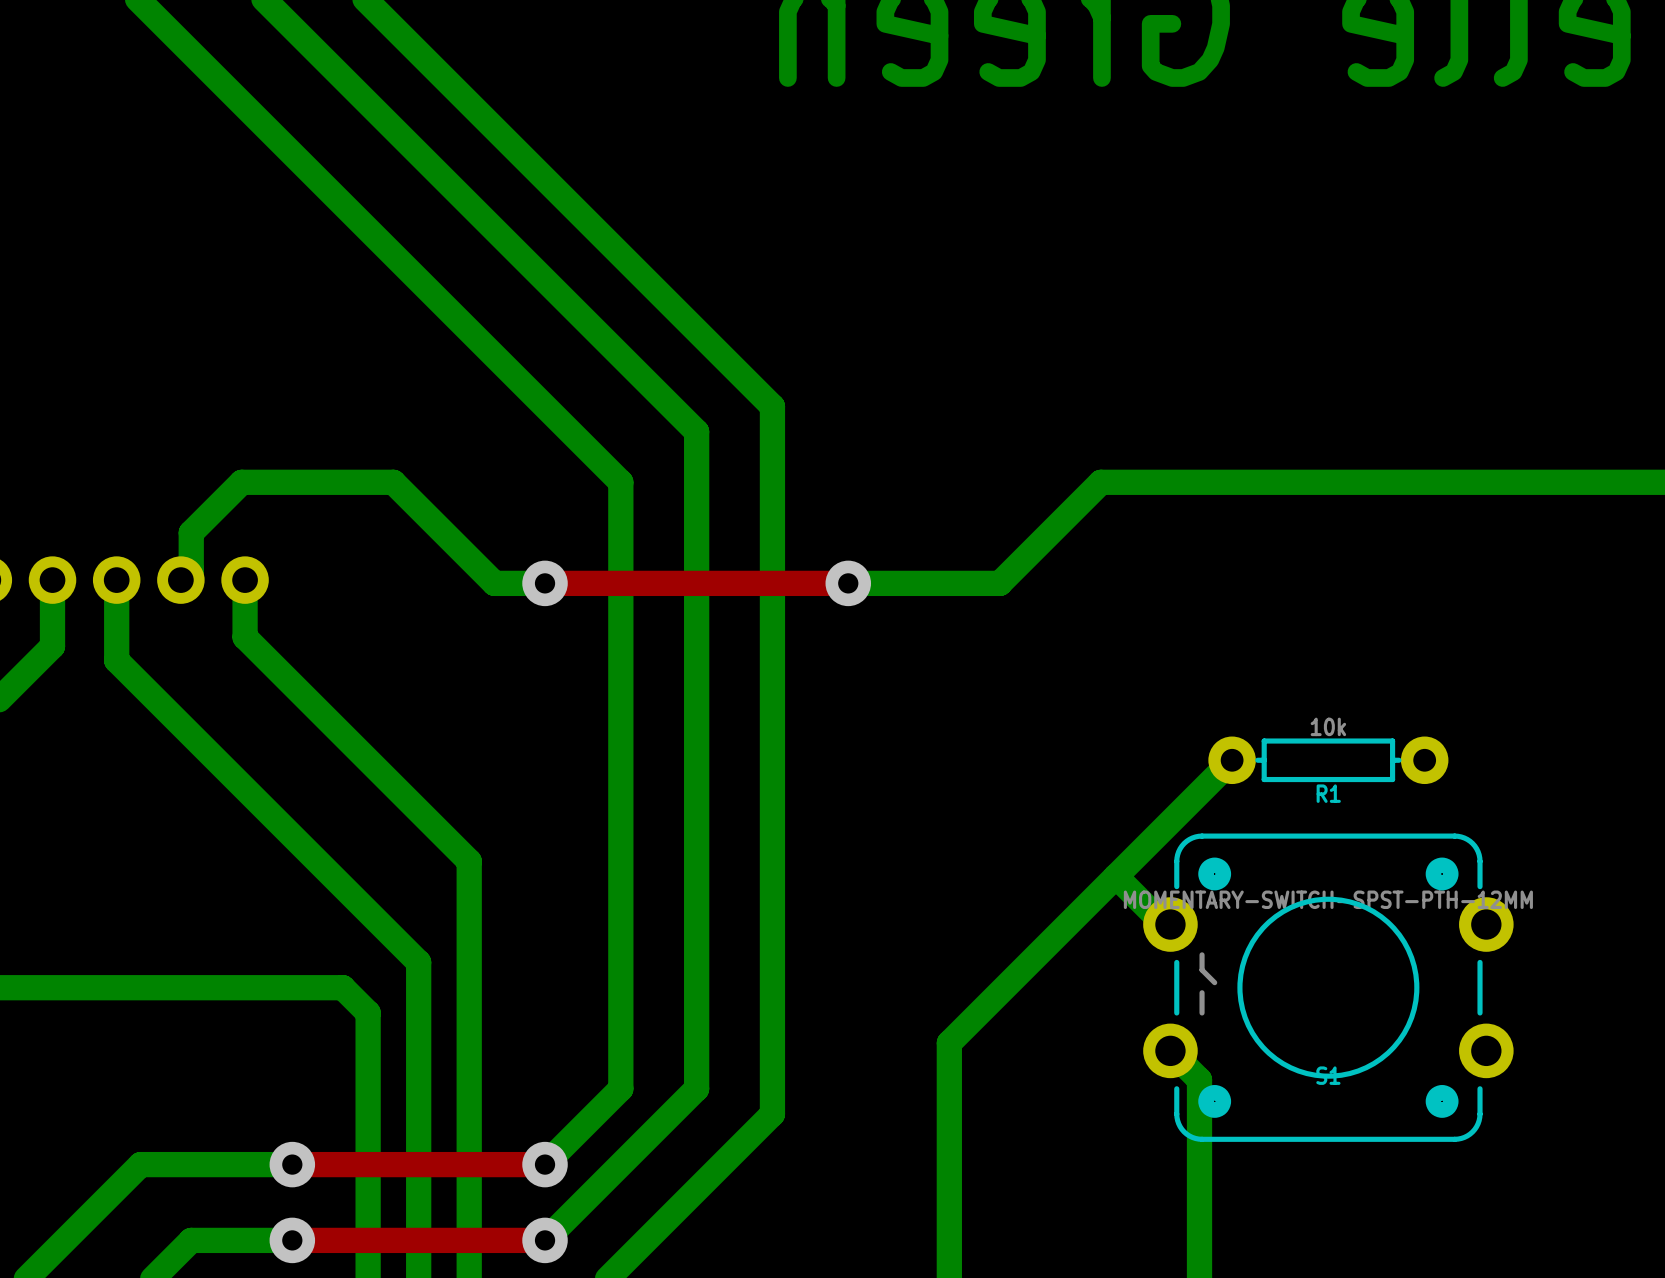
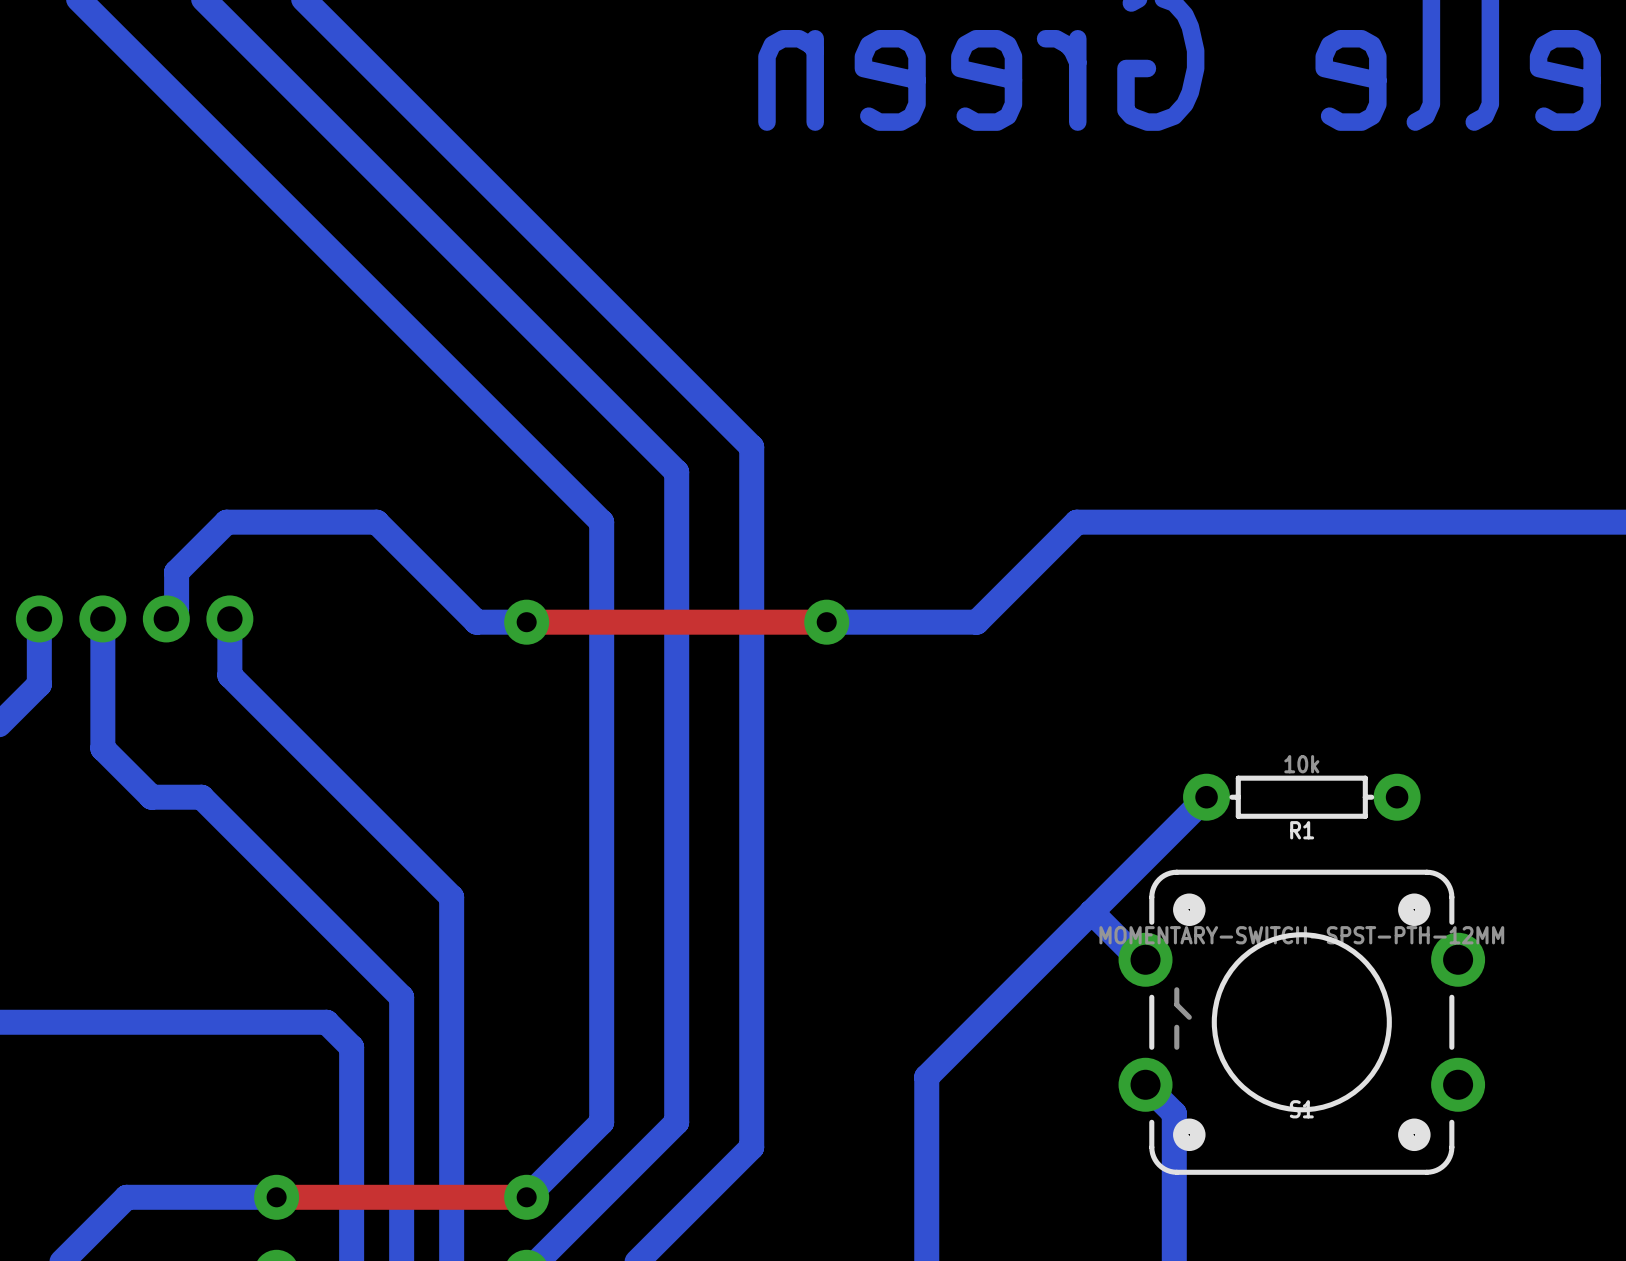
bottom track: (116, 660) (216, 760) -> (102, 698) (102, 748) (151, 797) (201, 797)

